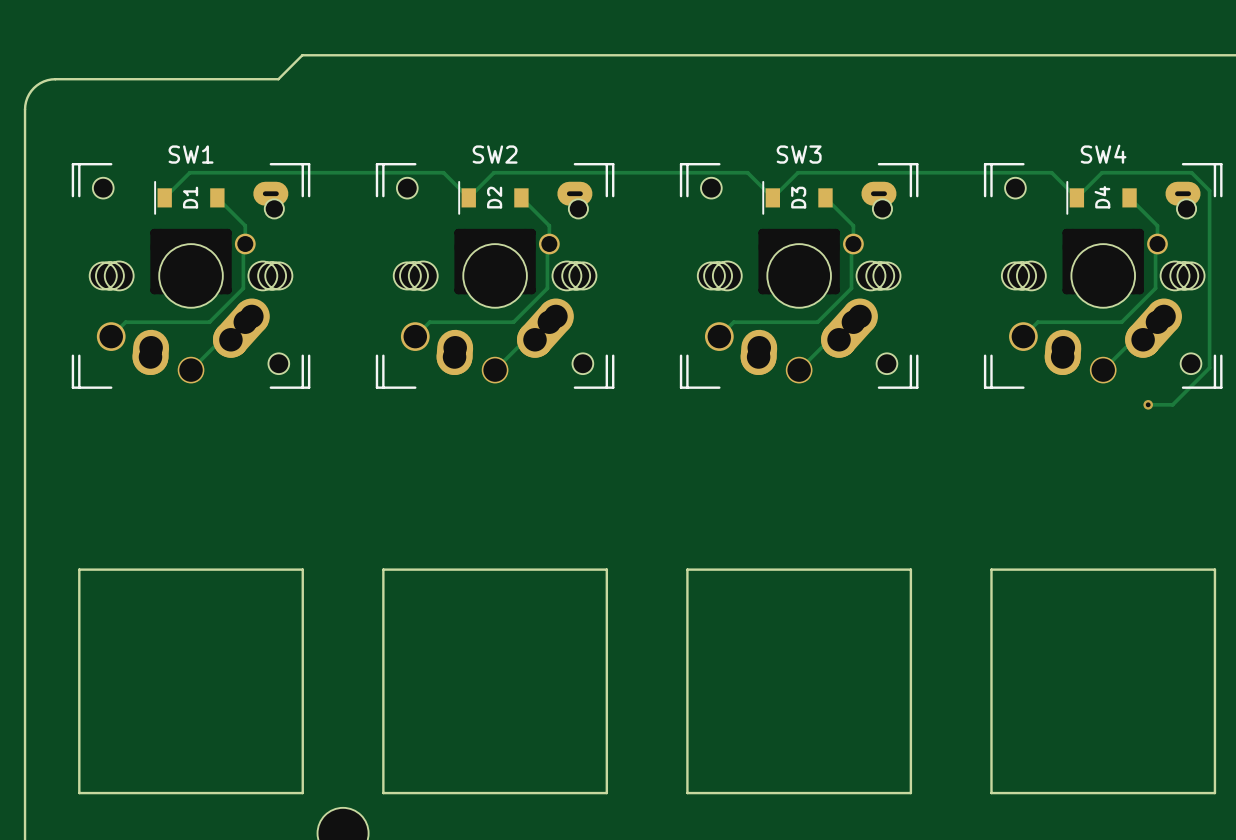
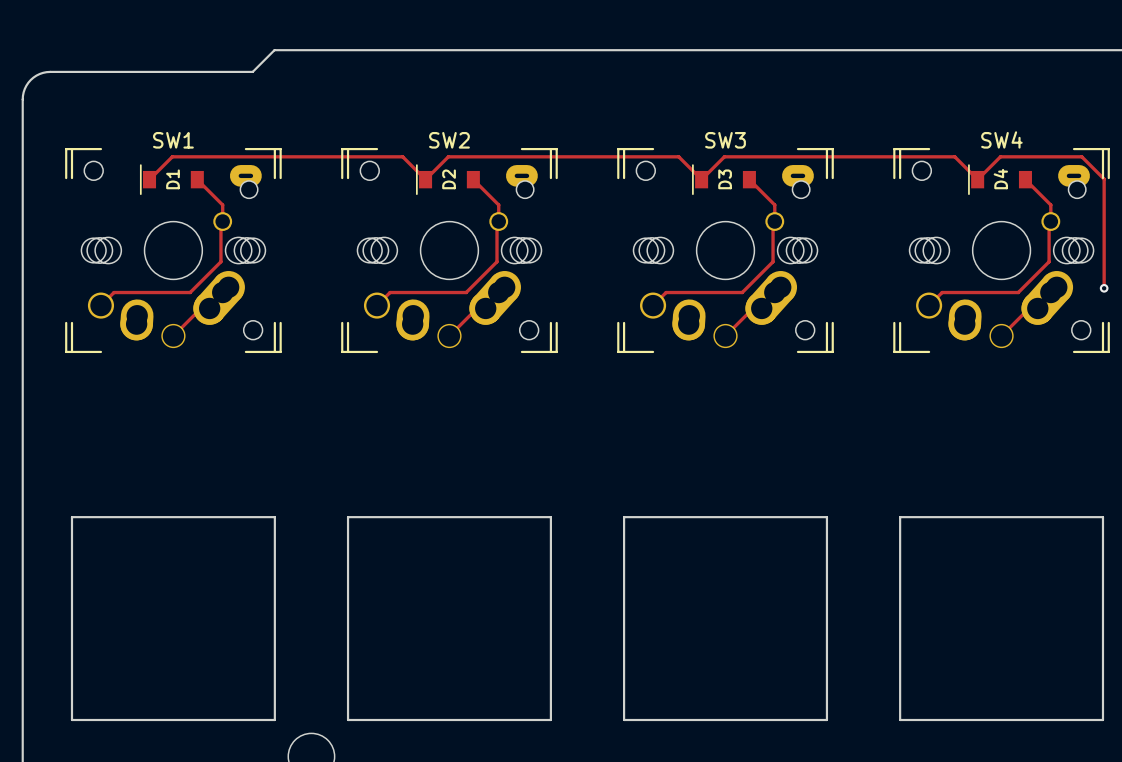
track: (1209, 190) (1209, 367) (1172, 404) (1148, 404) -> (1098, 173) (1104, 179) (1104, 288)
via: none -> (1104, 288)
via: (1148, 404) -> none

